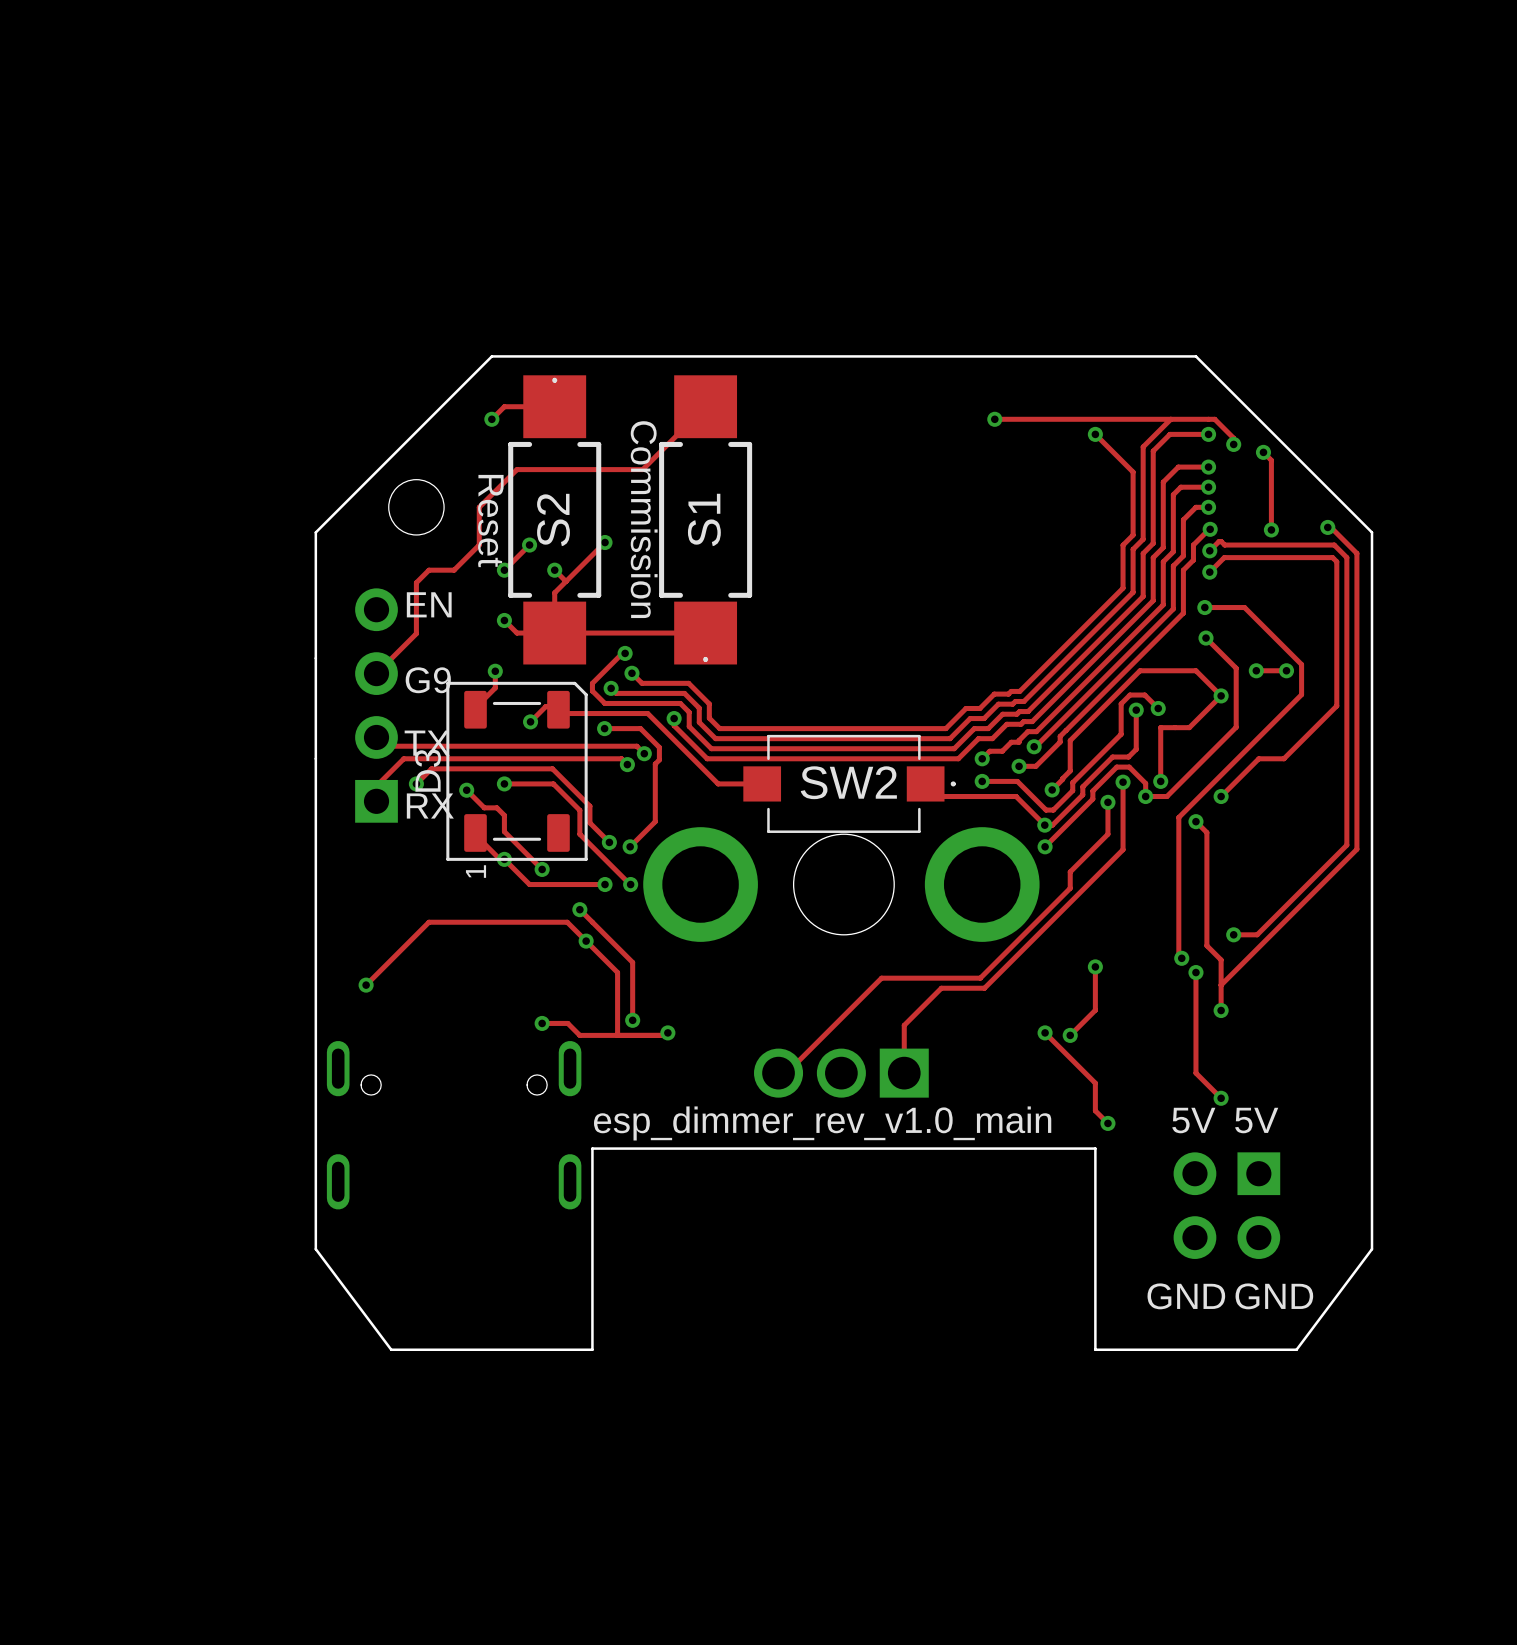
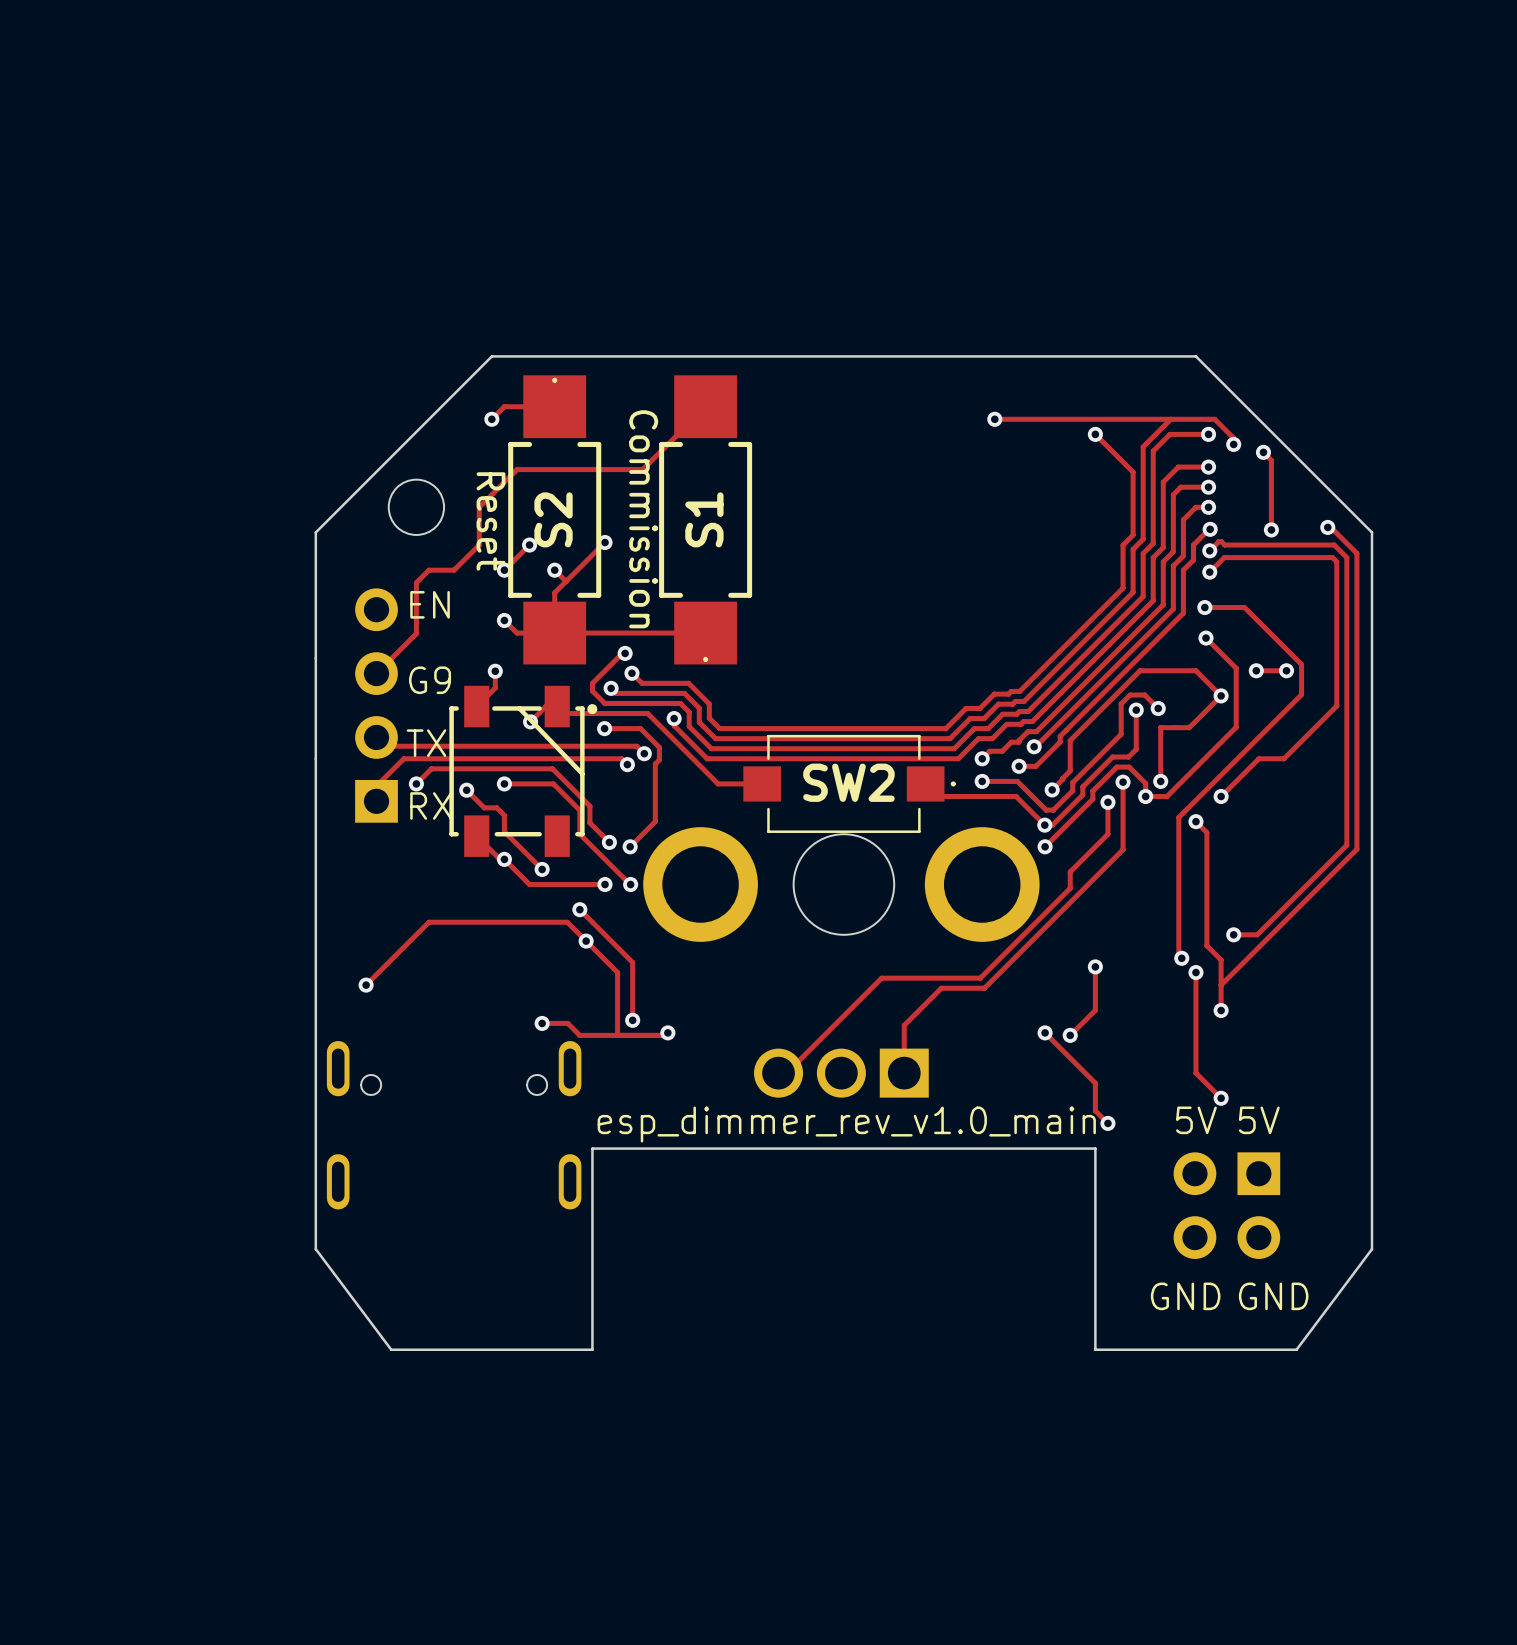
D3: (516, 771) -> none
part: none -> (523, 771)

